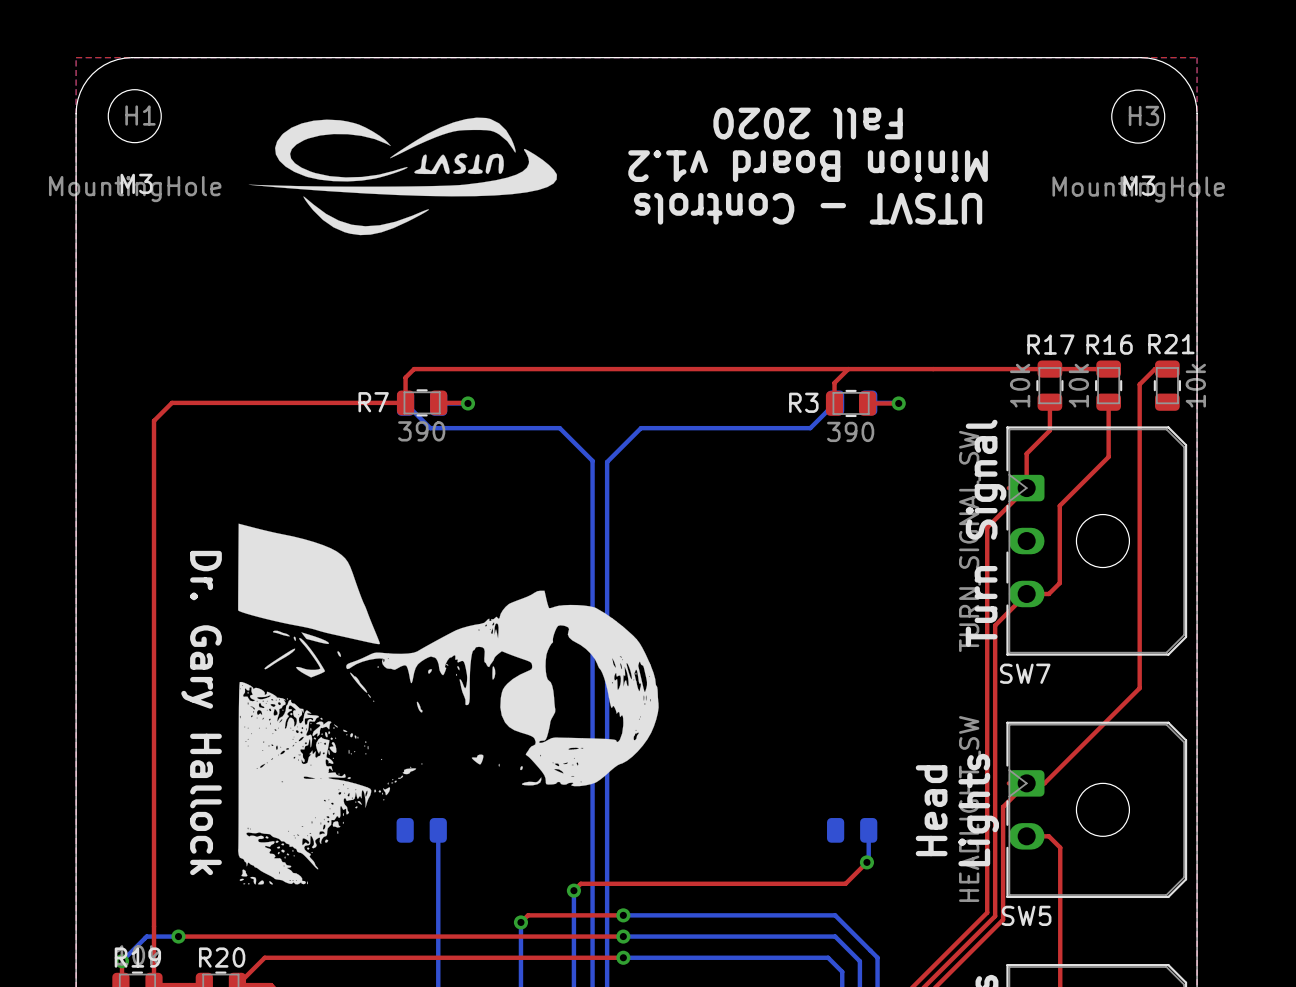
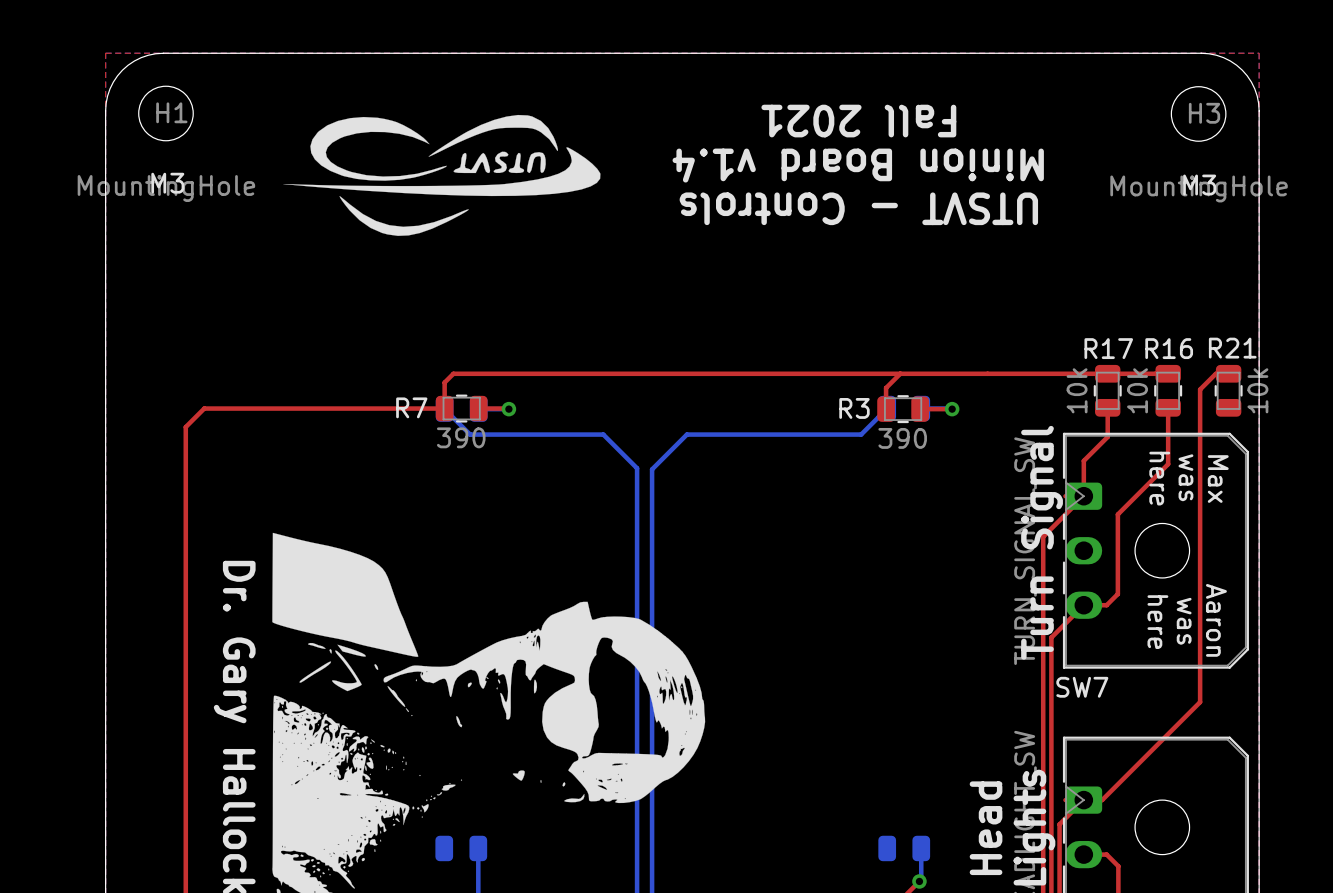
text: Fall 2020 (808, 123) -> Fall 2021 (858, 121)
text: Minion Board v1.2 (808, 166) -> Minion Board v1.4 (858, 165)
text: none -> here (1159, 478)
text: none -> was (1185, 477)
text: none -> Max (1218, 479)
text: none -> Aaron (1216, 620)
text: none -> was (1184, 621)
text: none -> here (1157, 622)

